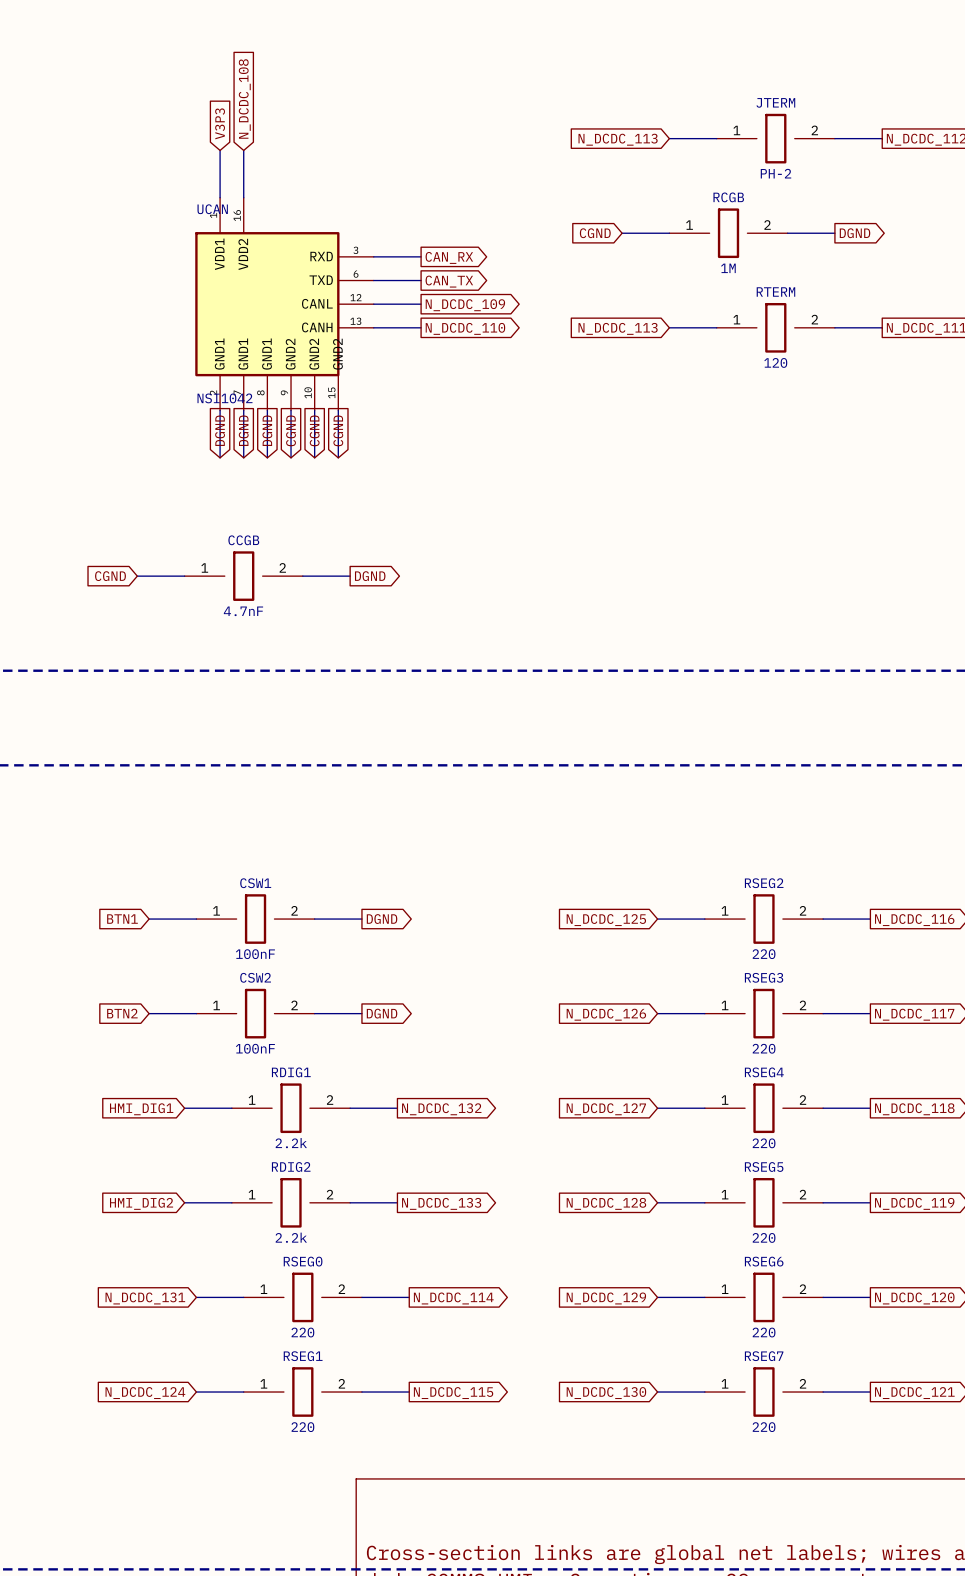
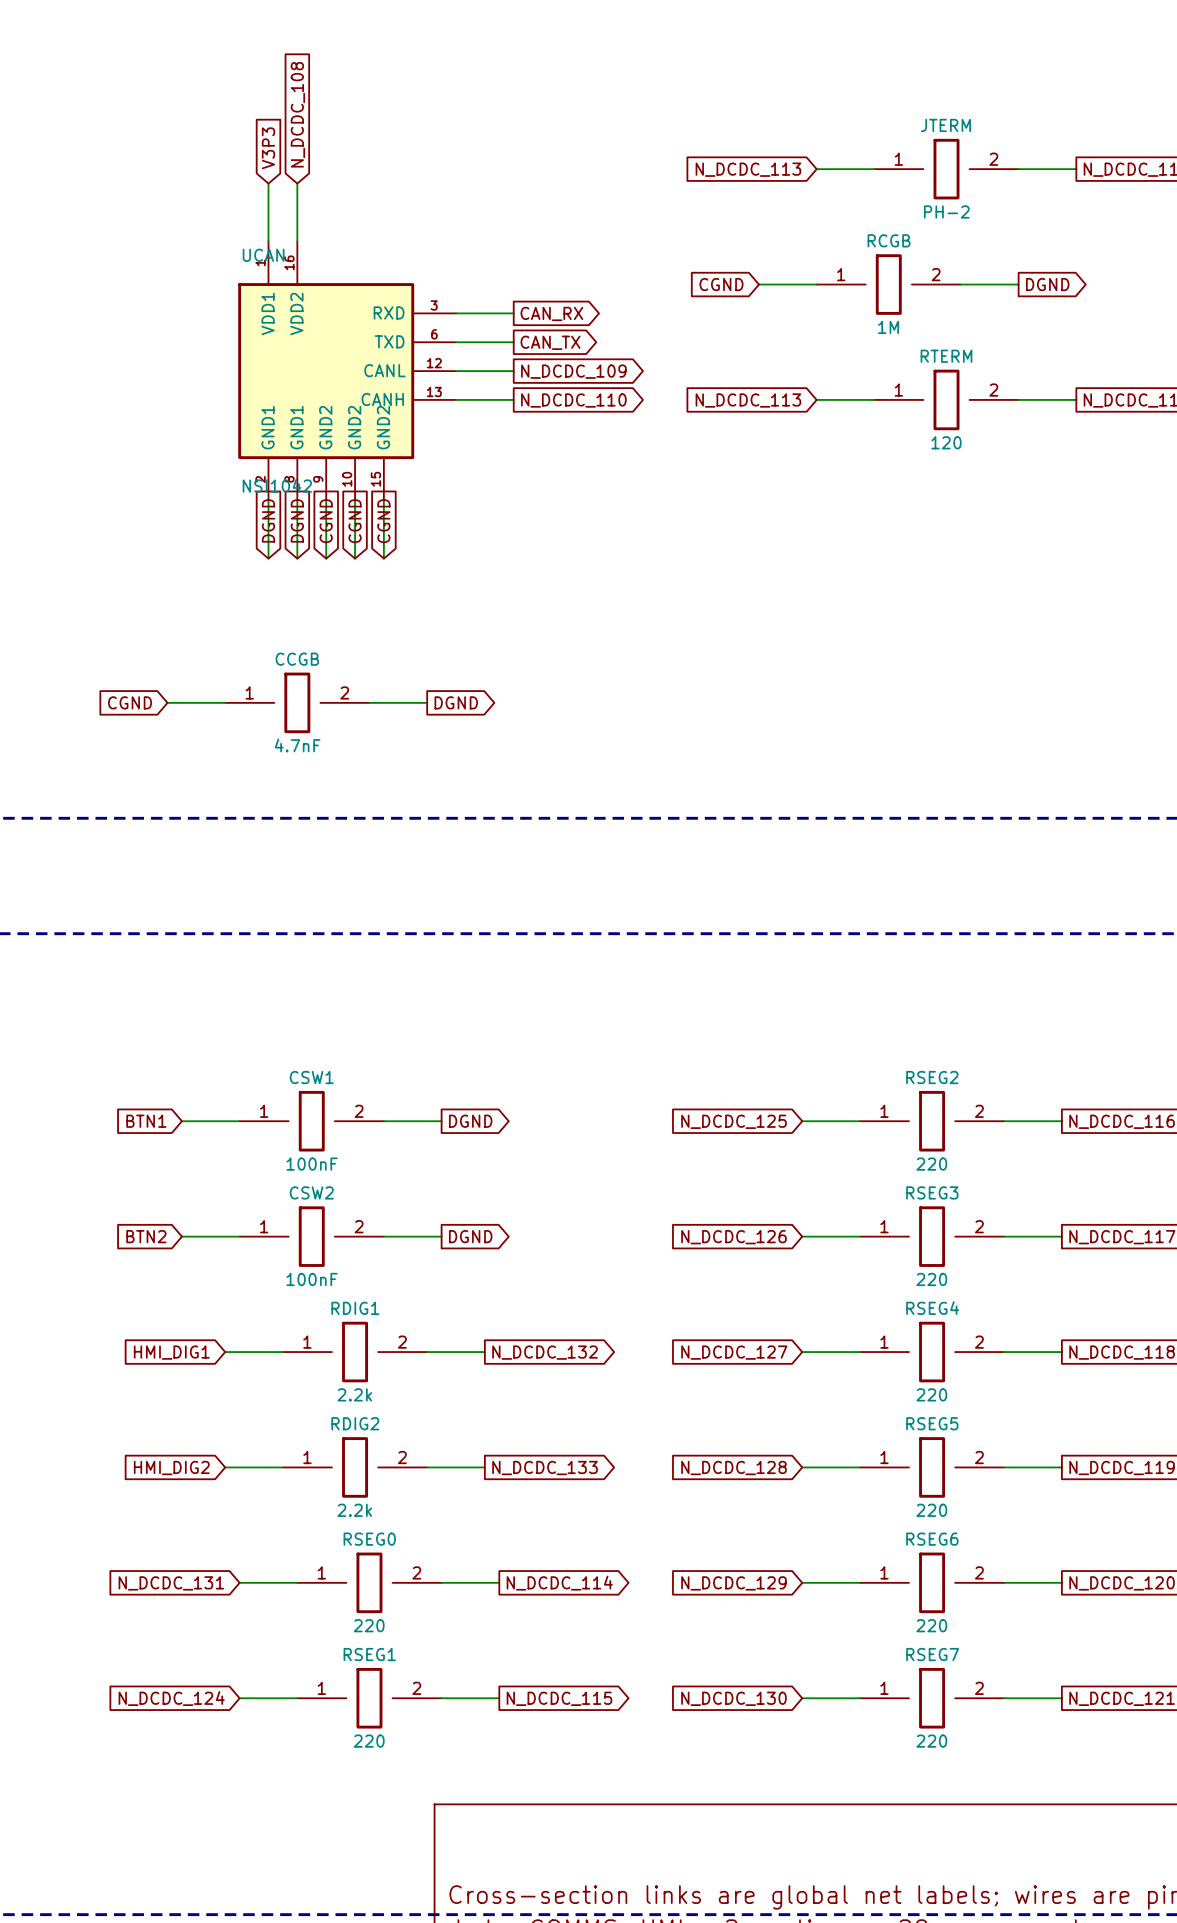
UCAN symbol: [195, 197, 374, 411] -> [238, 241, 457, 501]
wire: (338, 410) (338, 457) -> none
global label: DGND (267, 430) -> CGND (326, 521)
global label: CGND (338, 430) -> none

